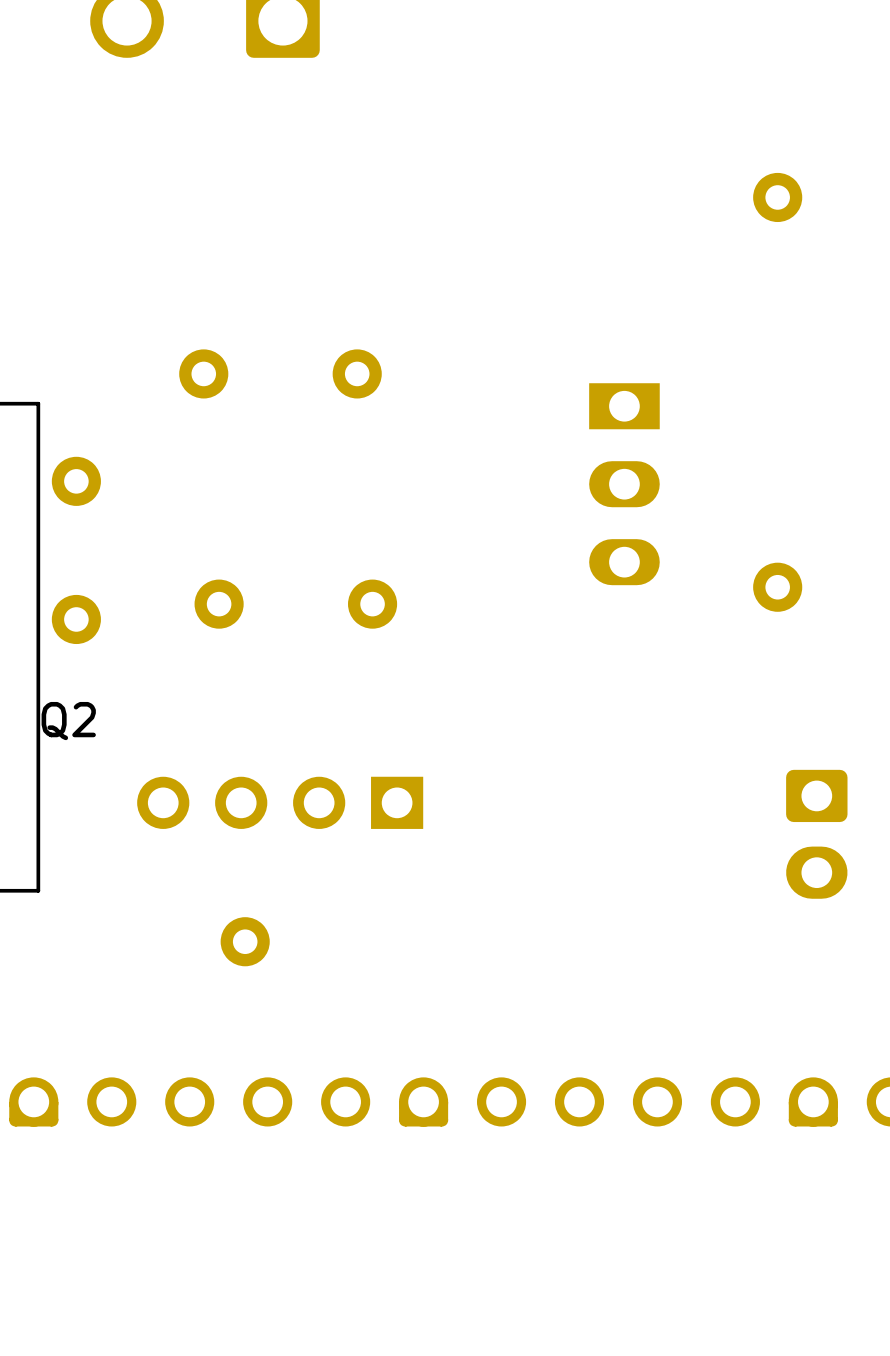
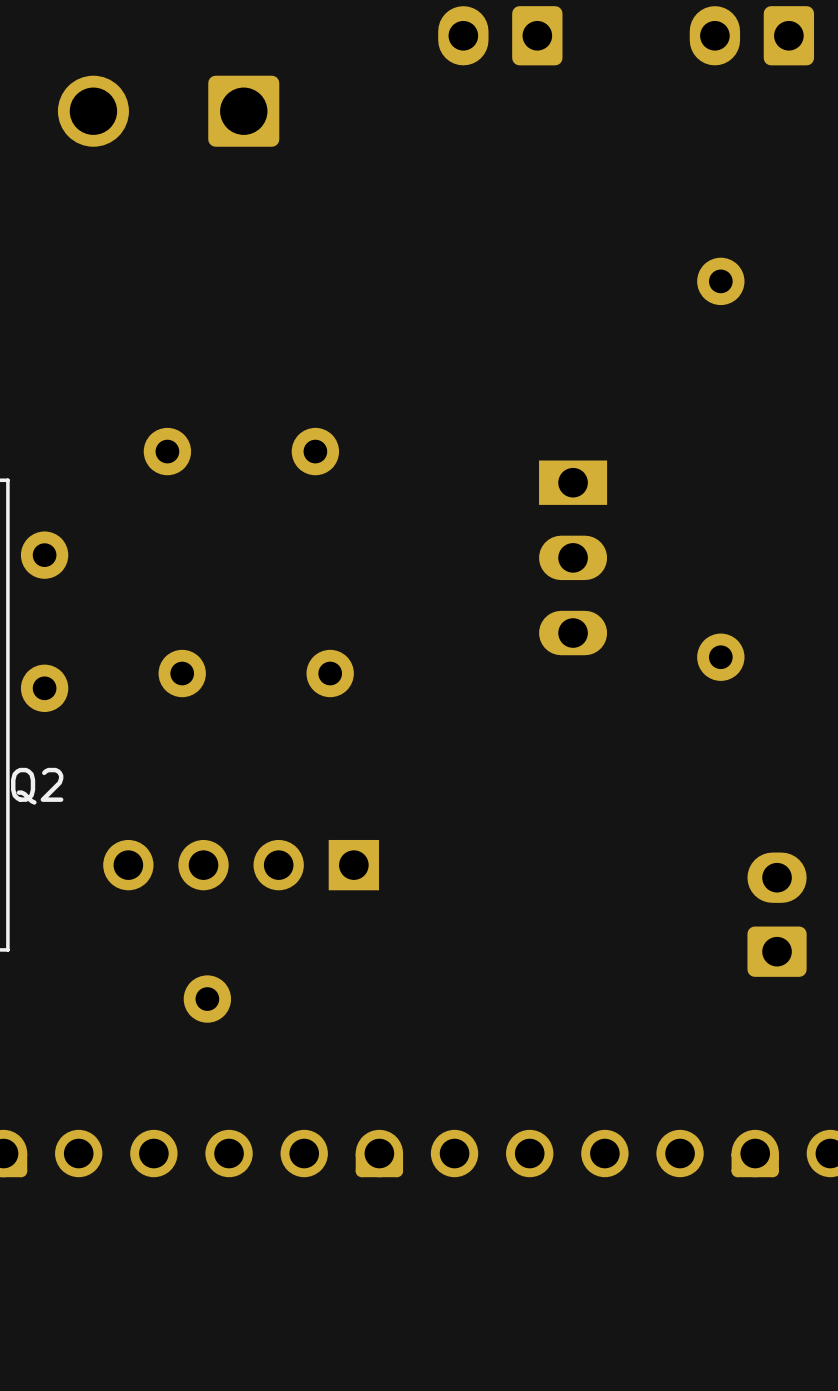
part rotation: 0° (816, 834) -> 180° (777, 914)

